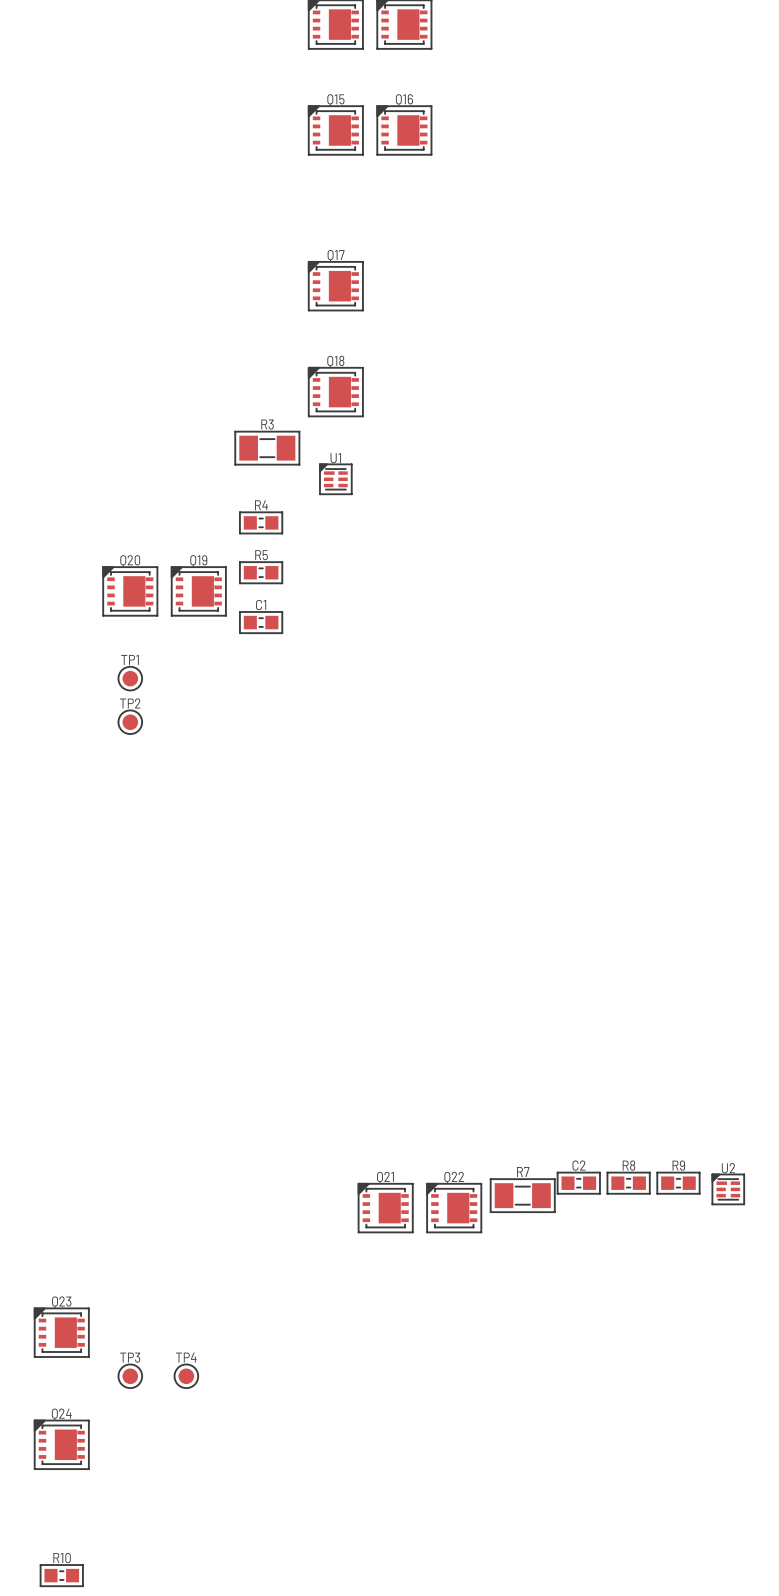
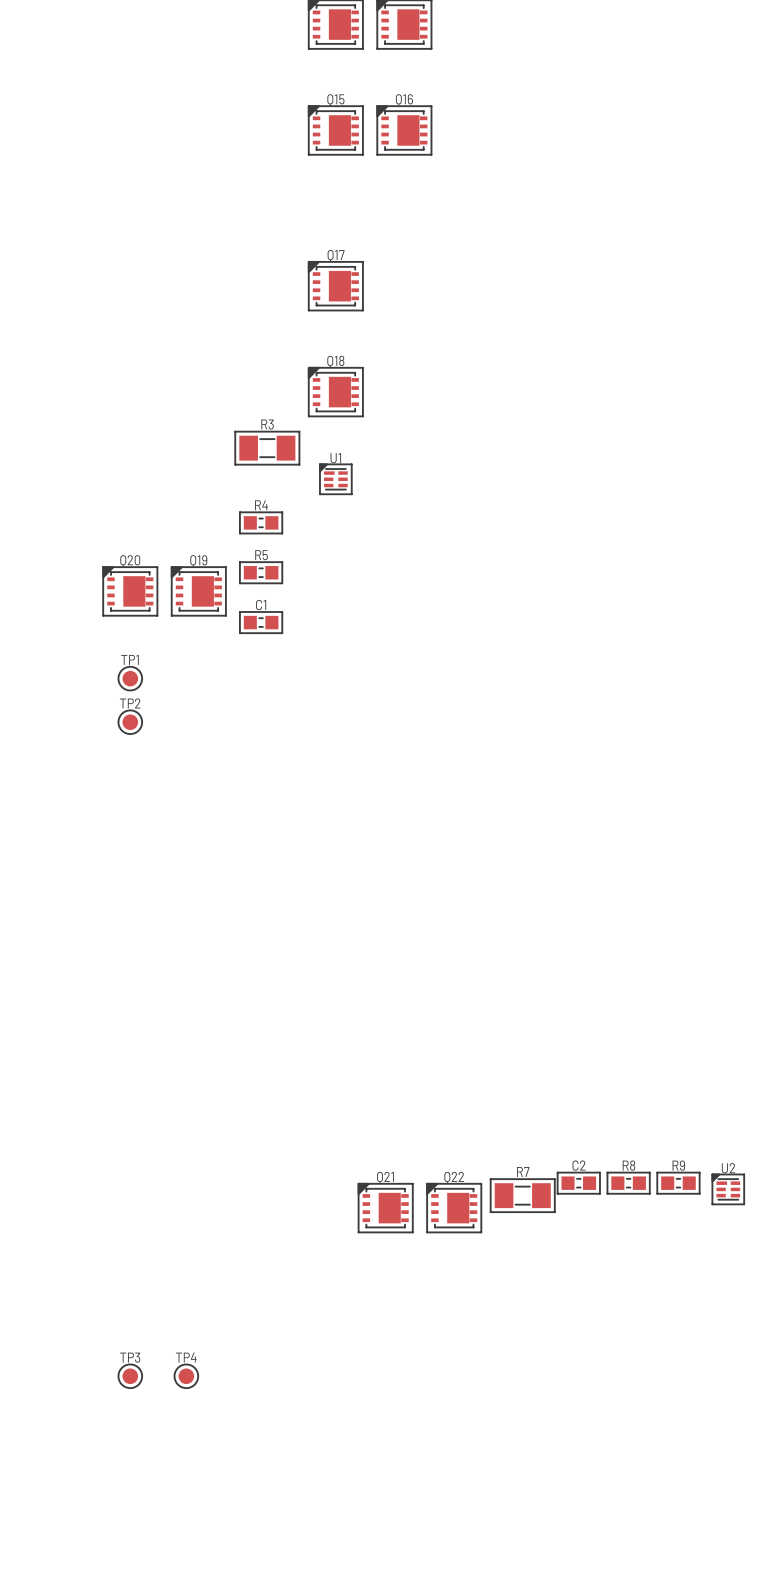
Q23: (61, 1332) -> none
Q24: (61, 1444) -> none
R10: (61, 1575) -> none

